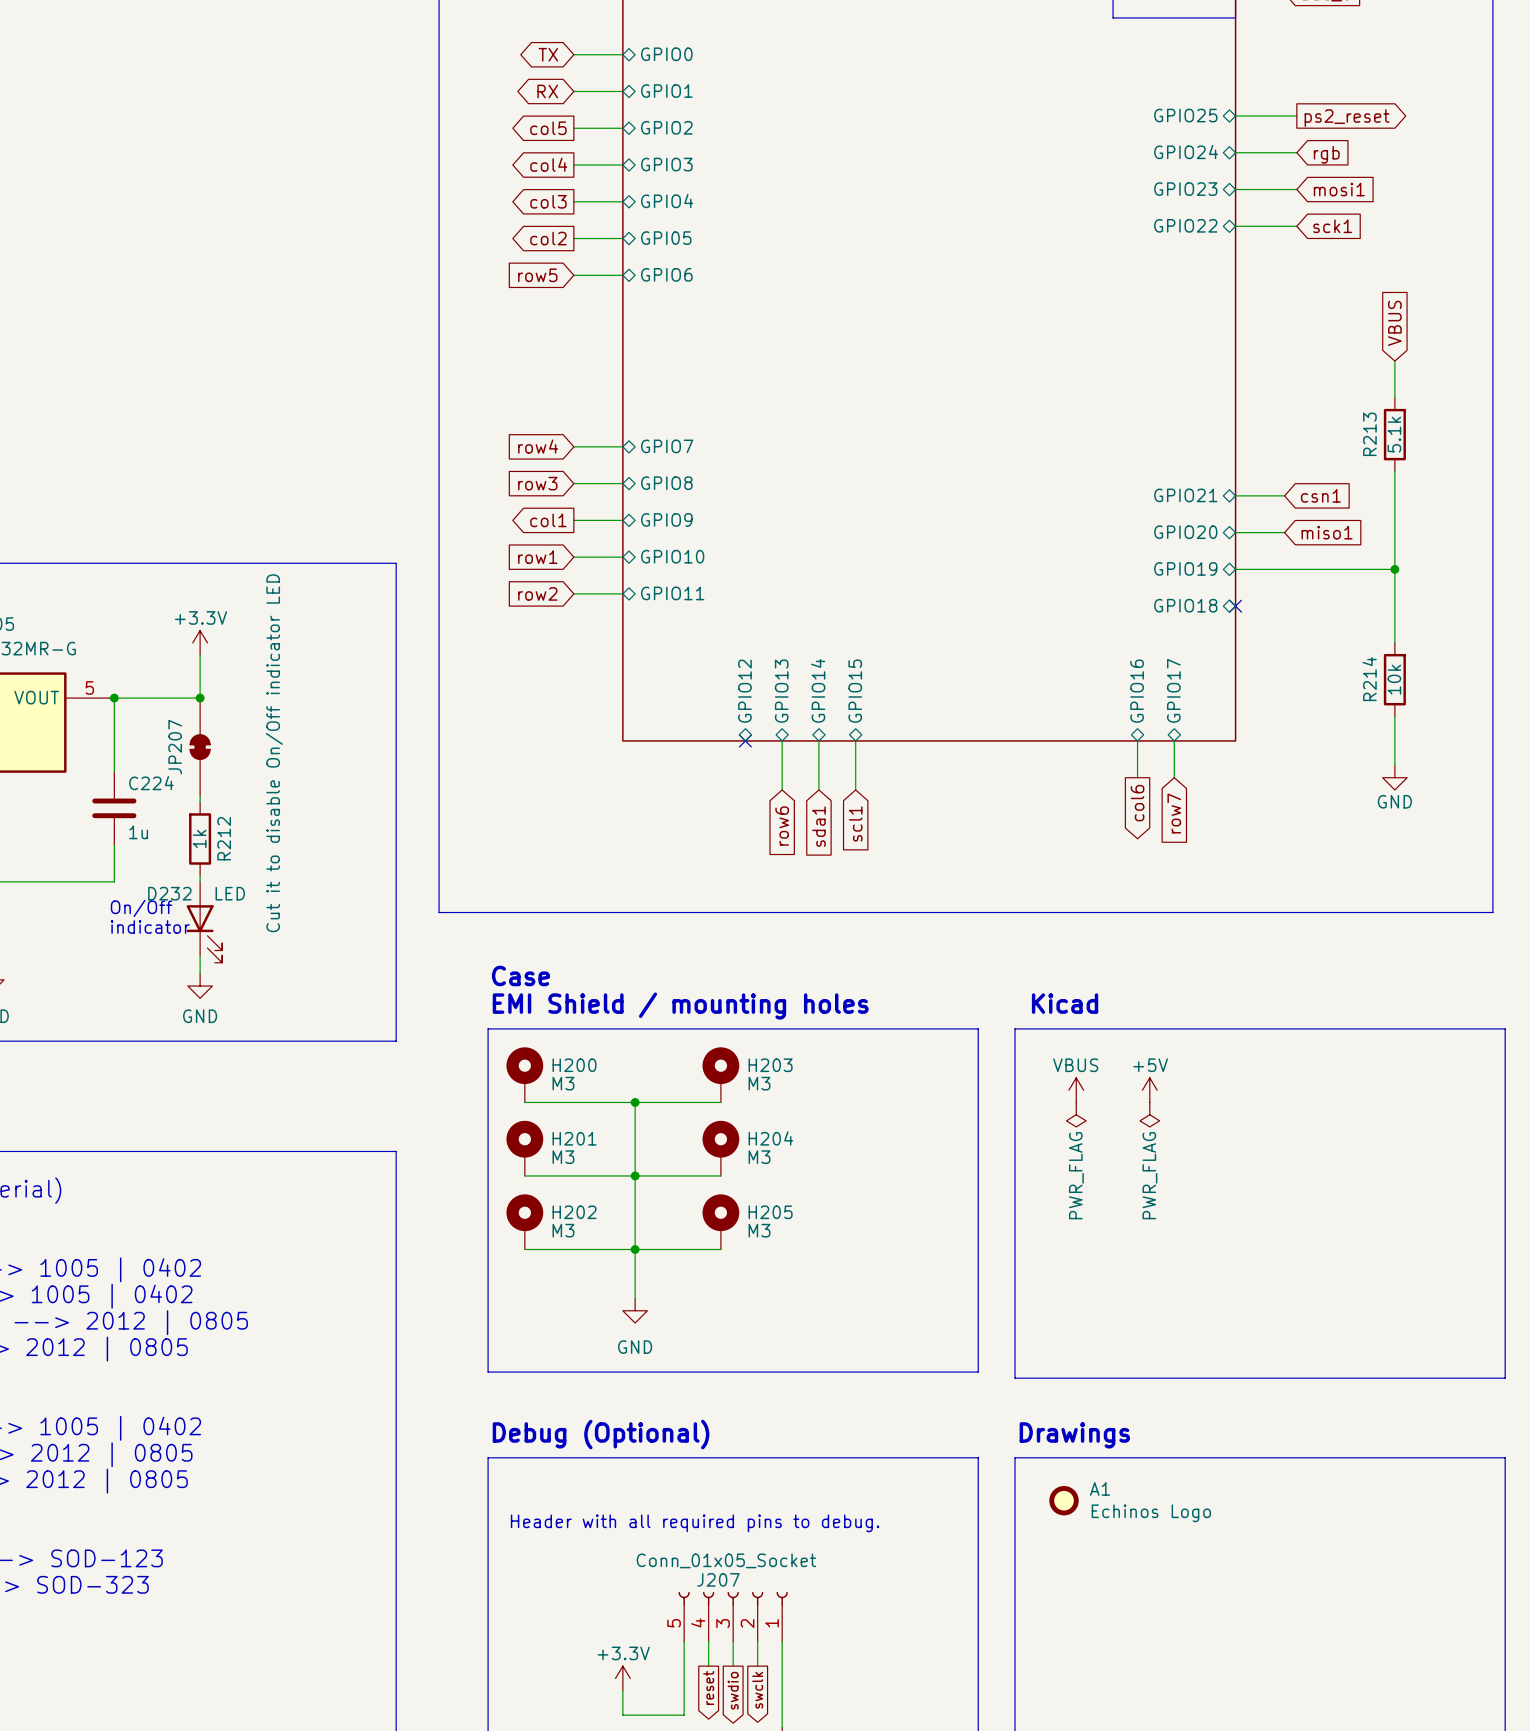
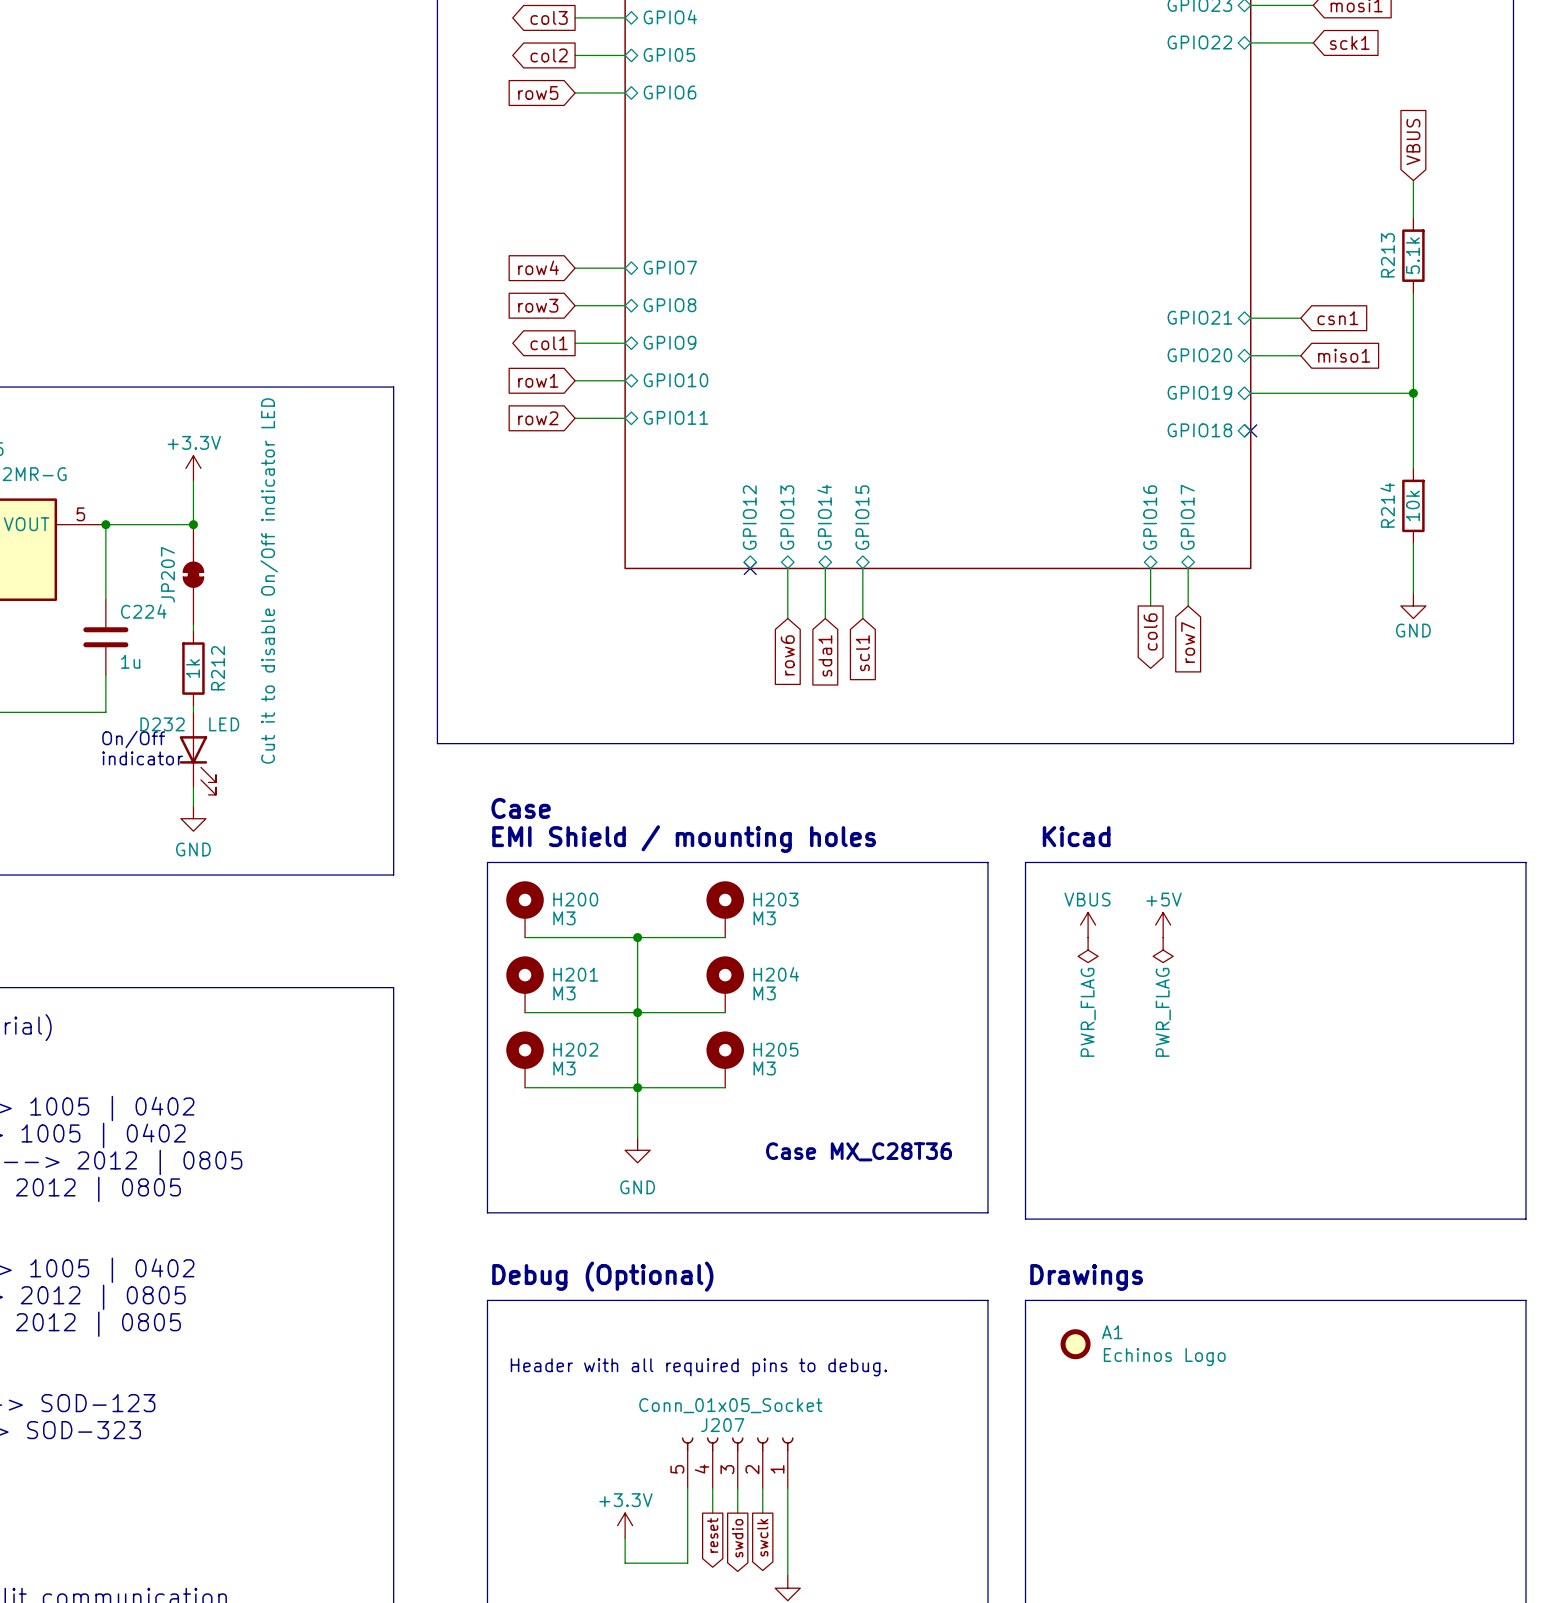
text: none -> Case MX_C28T36 (859, 1151)

